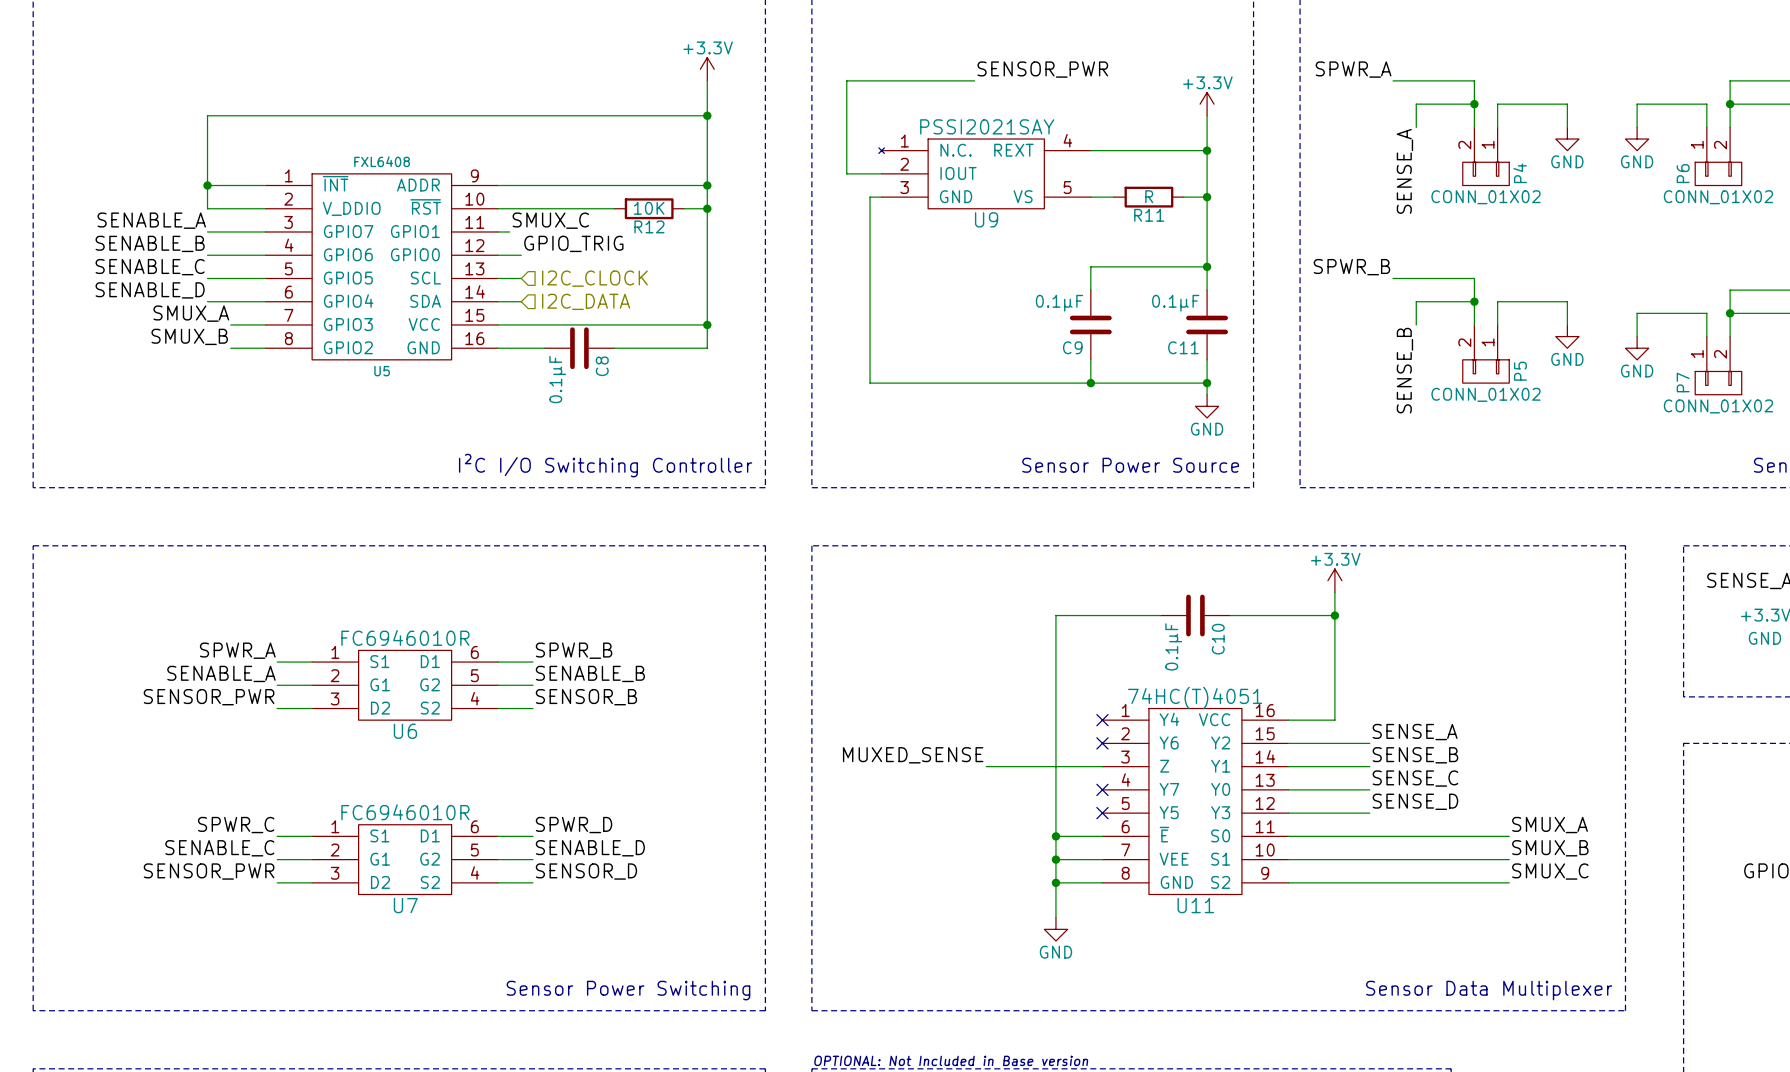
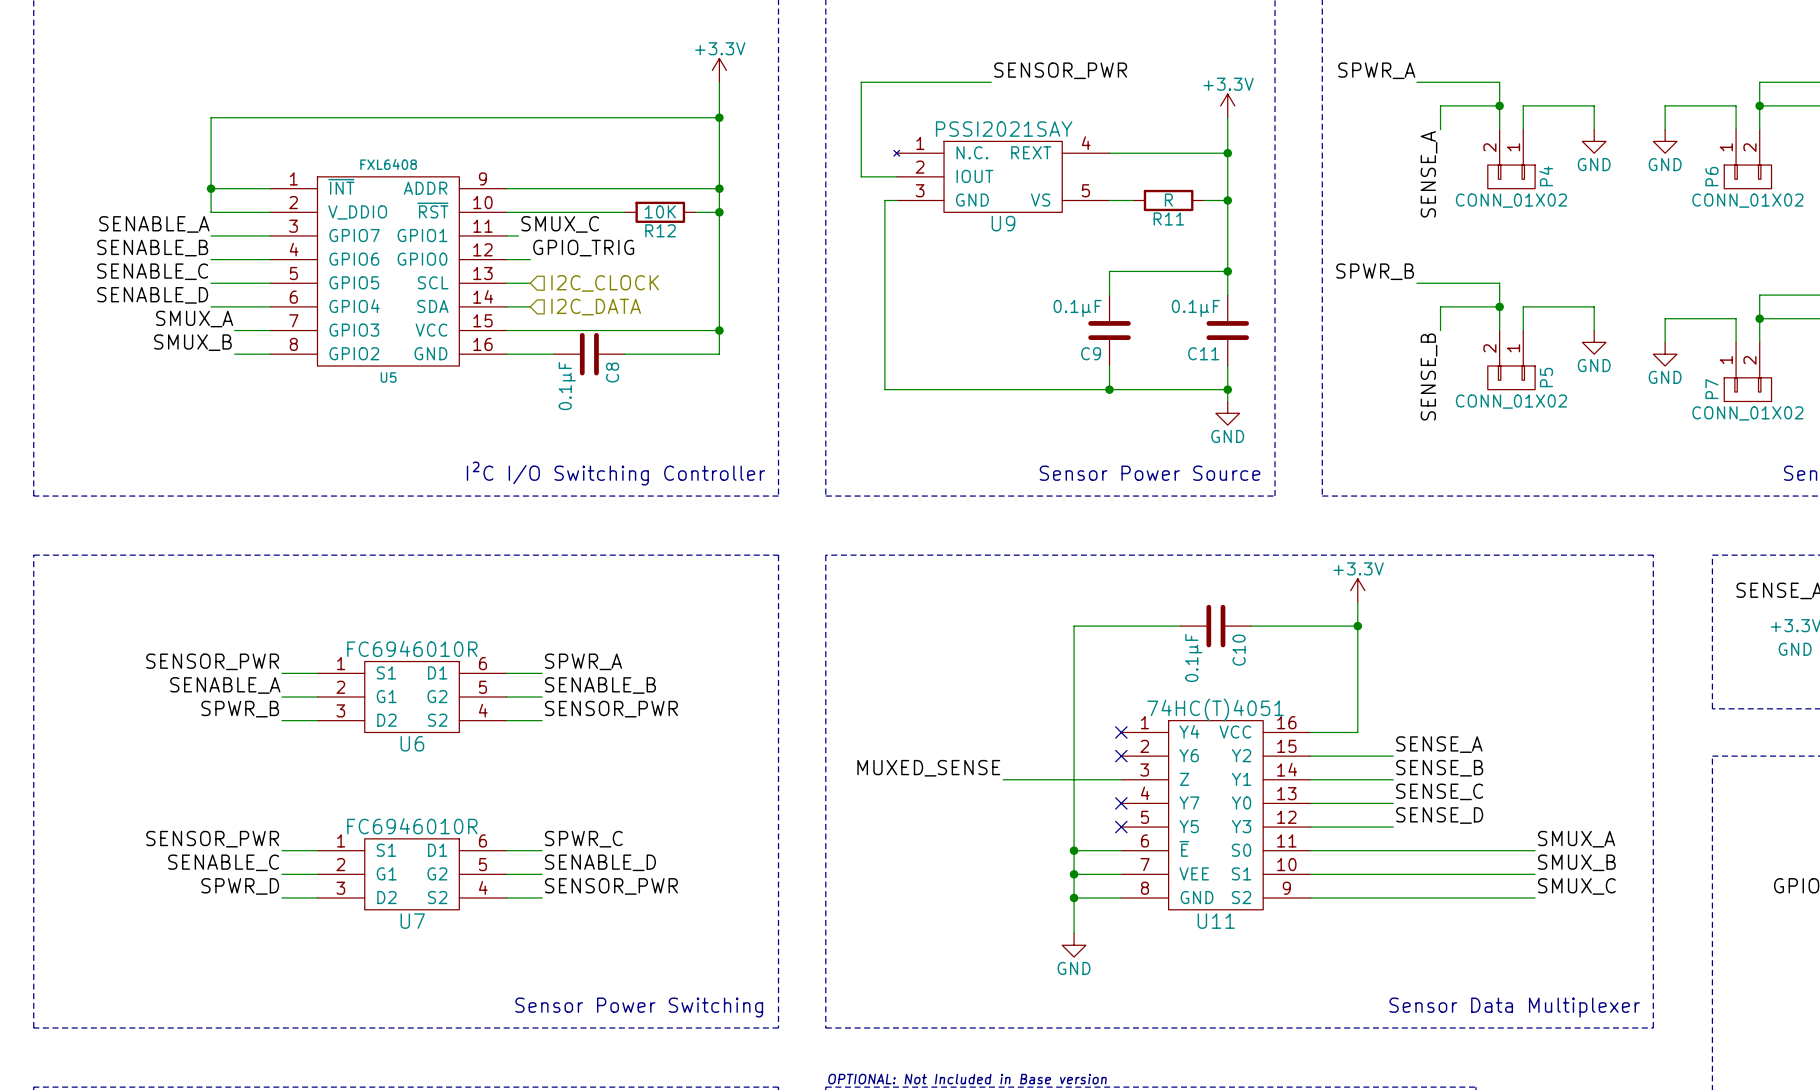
label: SPWR_A (237, 650) -> SENSOR_PWR (212, 661)
label: SPWR_B (574, 650) -> SPWR_A (583, 661)
label: SENSOR_PWR (209, 697) -> SPWR_B (240, 709)
label: SENSOR_B (586, 697) -> SENSOR_PWR (611, 709)
label: SPWR_C (236, 825) -> SENSOR_PWR (212, 839)
label: SPWR_D (574, 825) -> SPWR_C (583, 839)
label: SENSOR_PWR (209, 871) -> SPWR_D (240, 886)
label: SENSOR_D (586, 871) -> SENSOR_PWR (611, 886)

